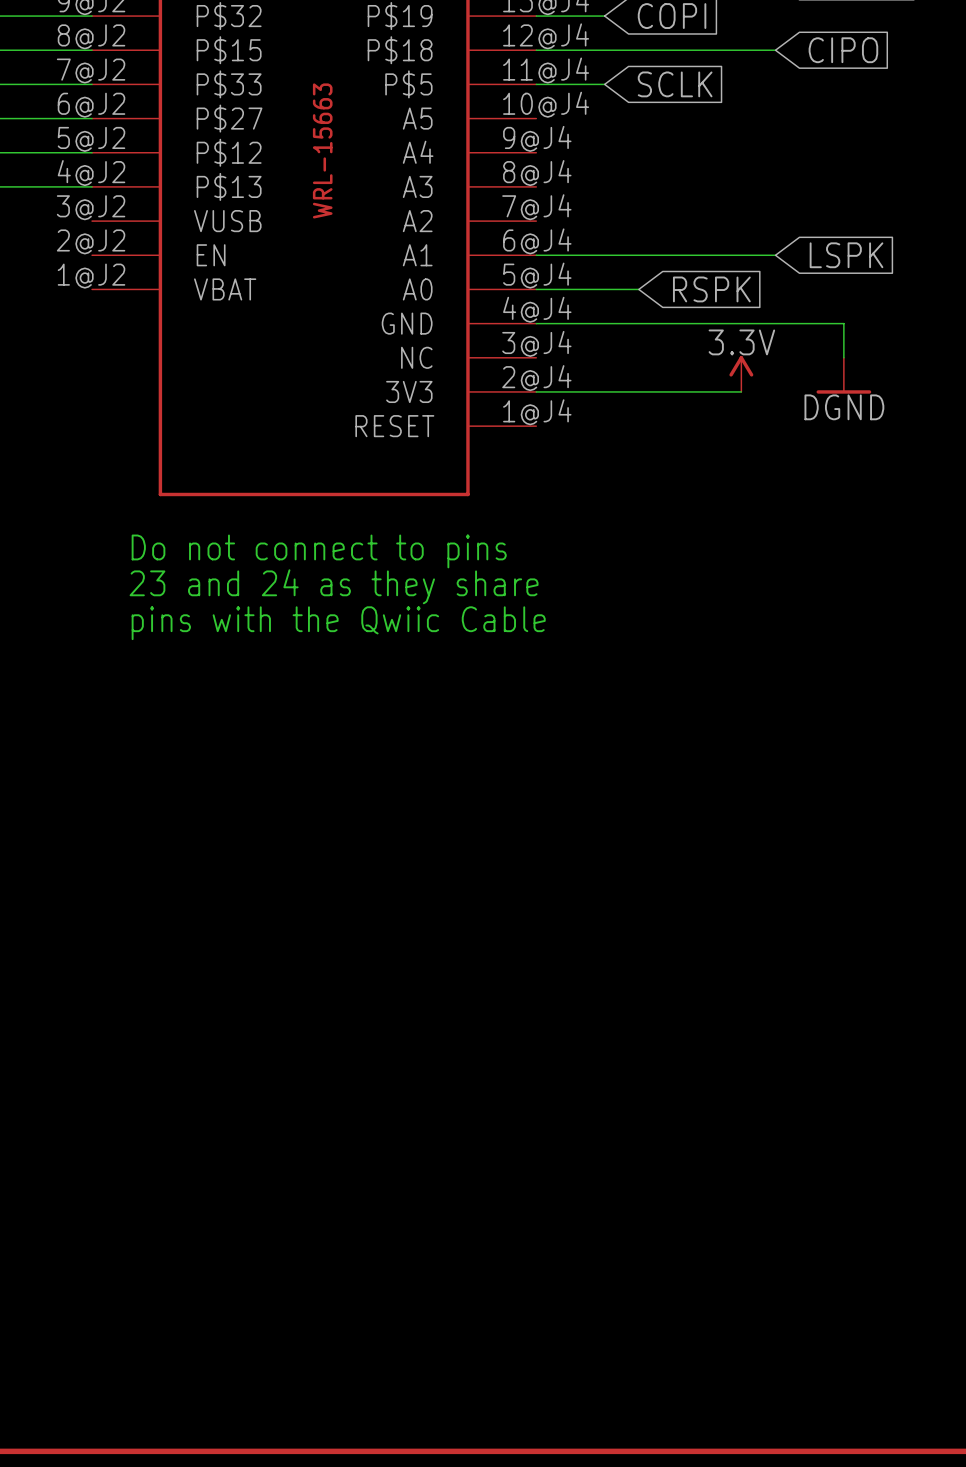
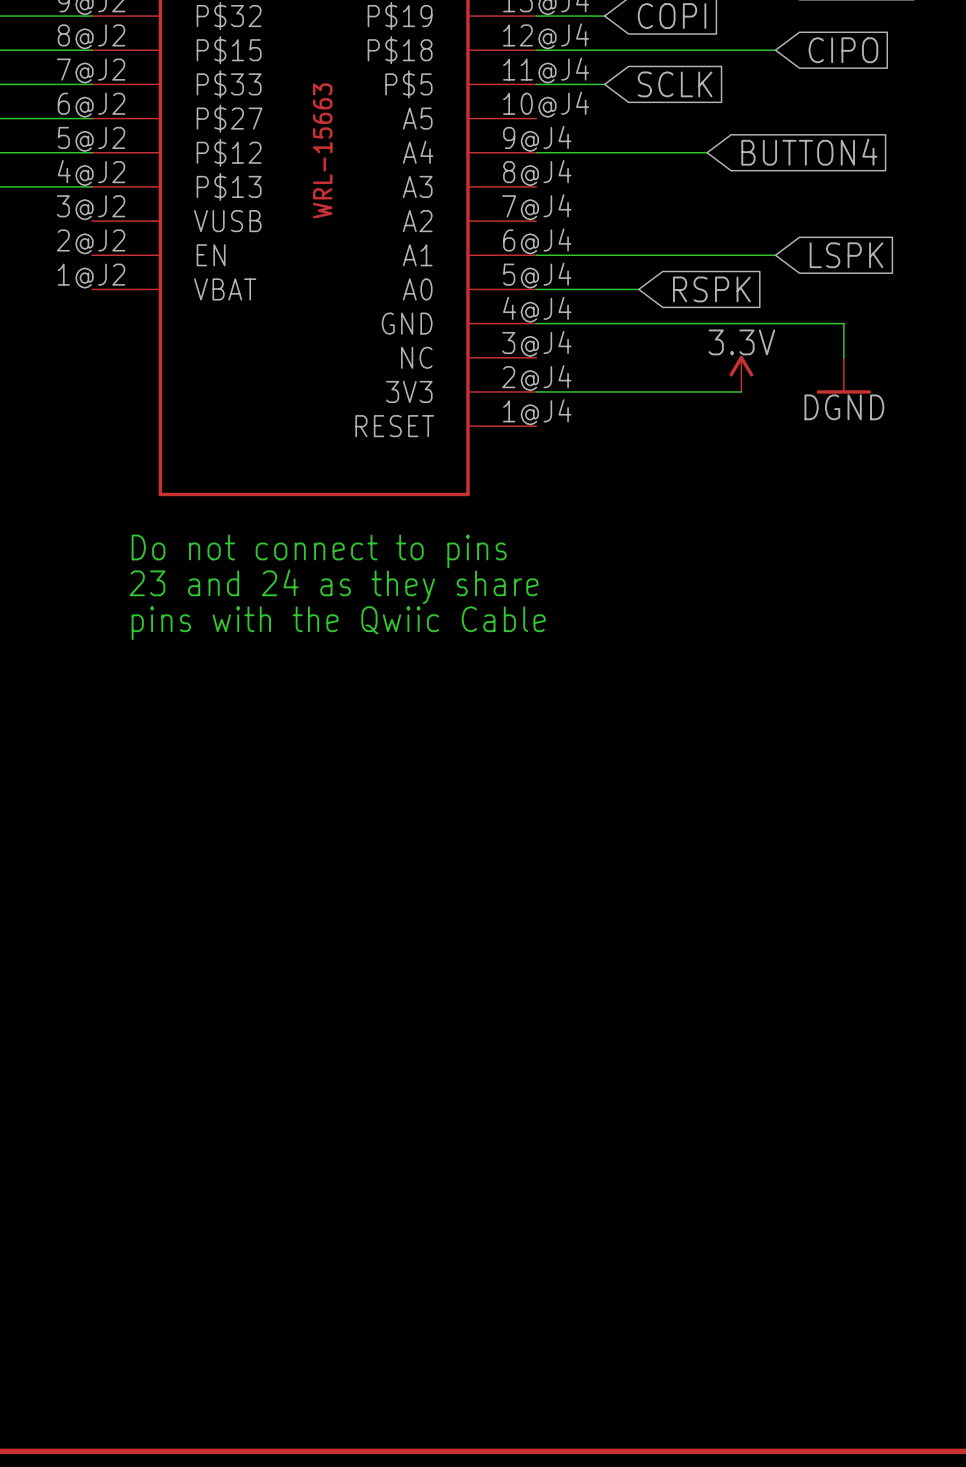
wire: none -> (536, 152) (707, 152)
global label: none -> BUTTON4 (809, 152)

